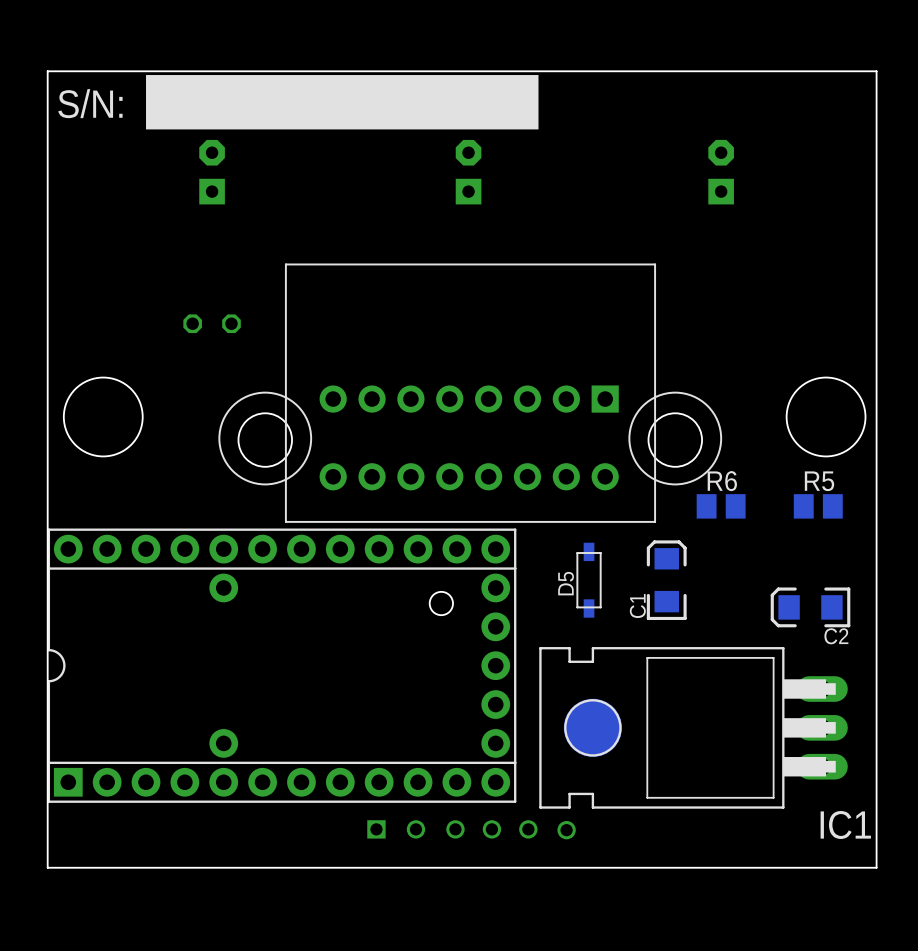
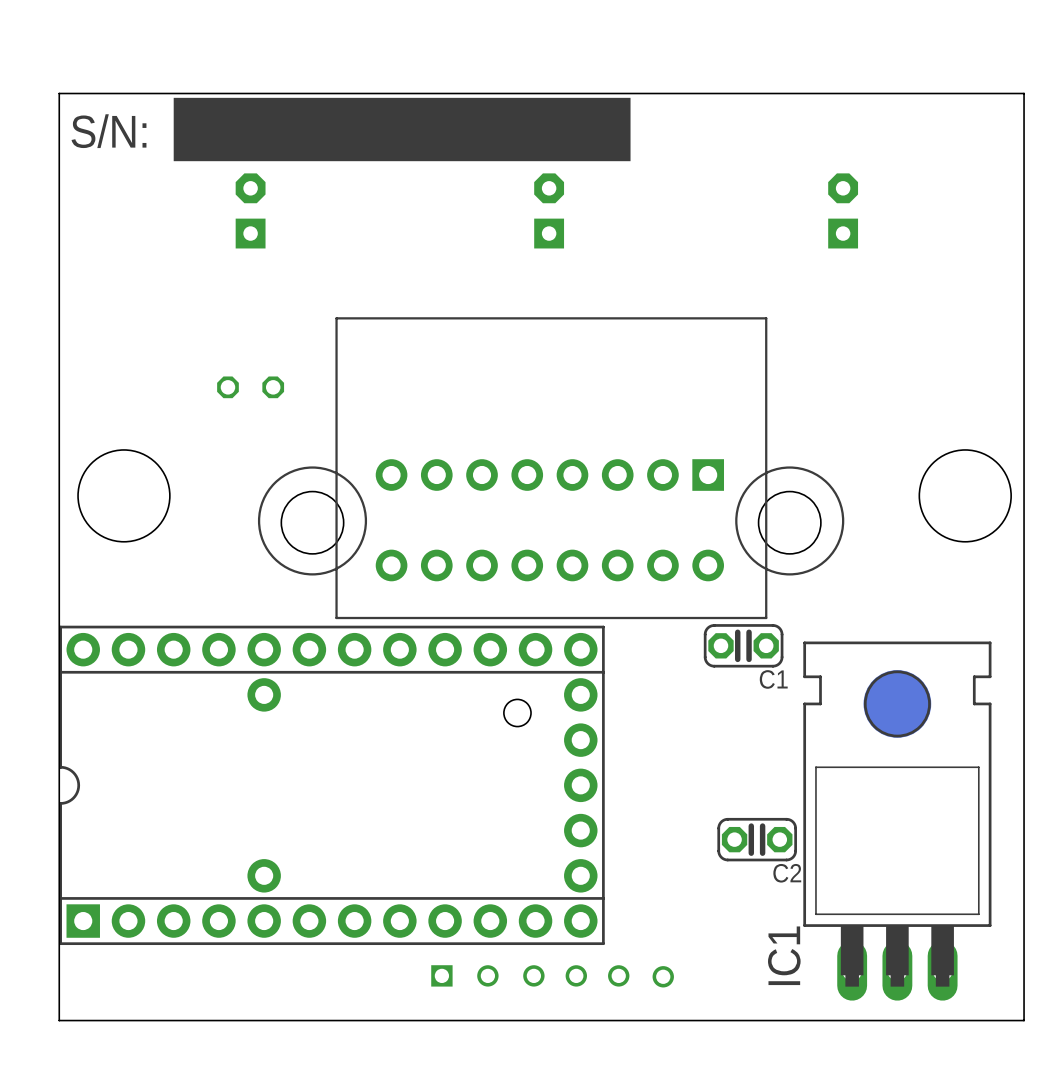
R6: (721, 506) -> none
R5: (818, 506) -> none
C1 footprint: [646, 540, 687, 621] -> [703, 624, 784, 668]
D5: (589, 580) -> none
C2 footprint: [770, 587, 851, 628] -> [717, 817, 797, 862]
C1 name position: C1 (637, 606) -> C1 (773, 679)
IC1 rotation: 0° (693, 727) -> 90° clockwise (897, 821)
IC1 name position: IC1 (845, 825) -> IC1 (784, 955)

